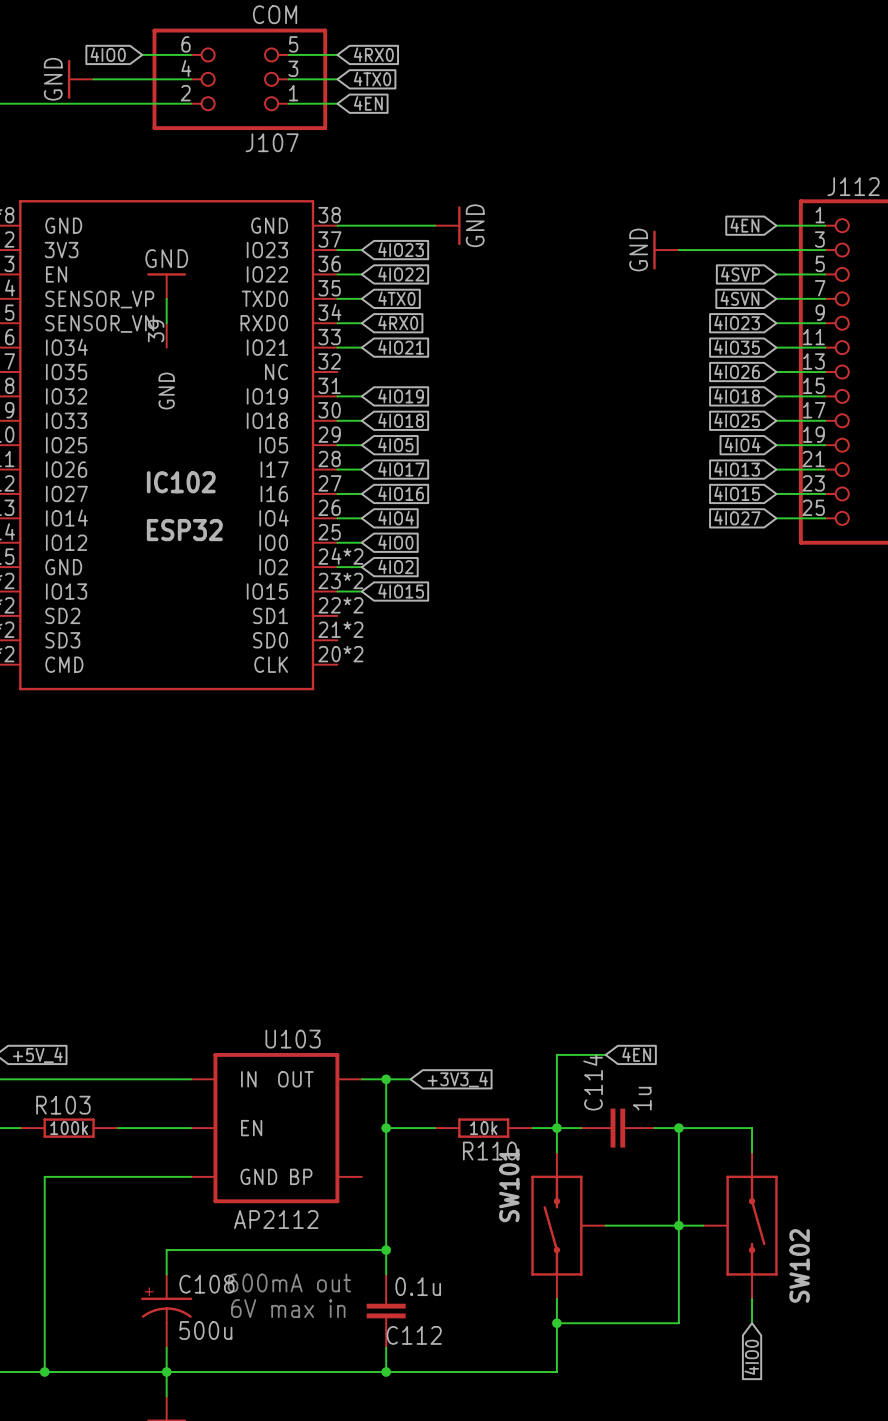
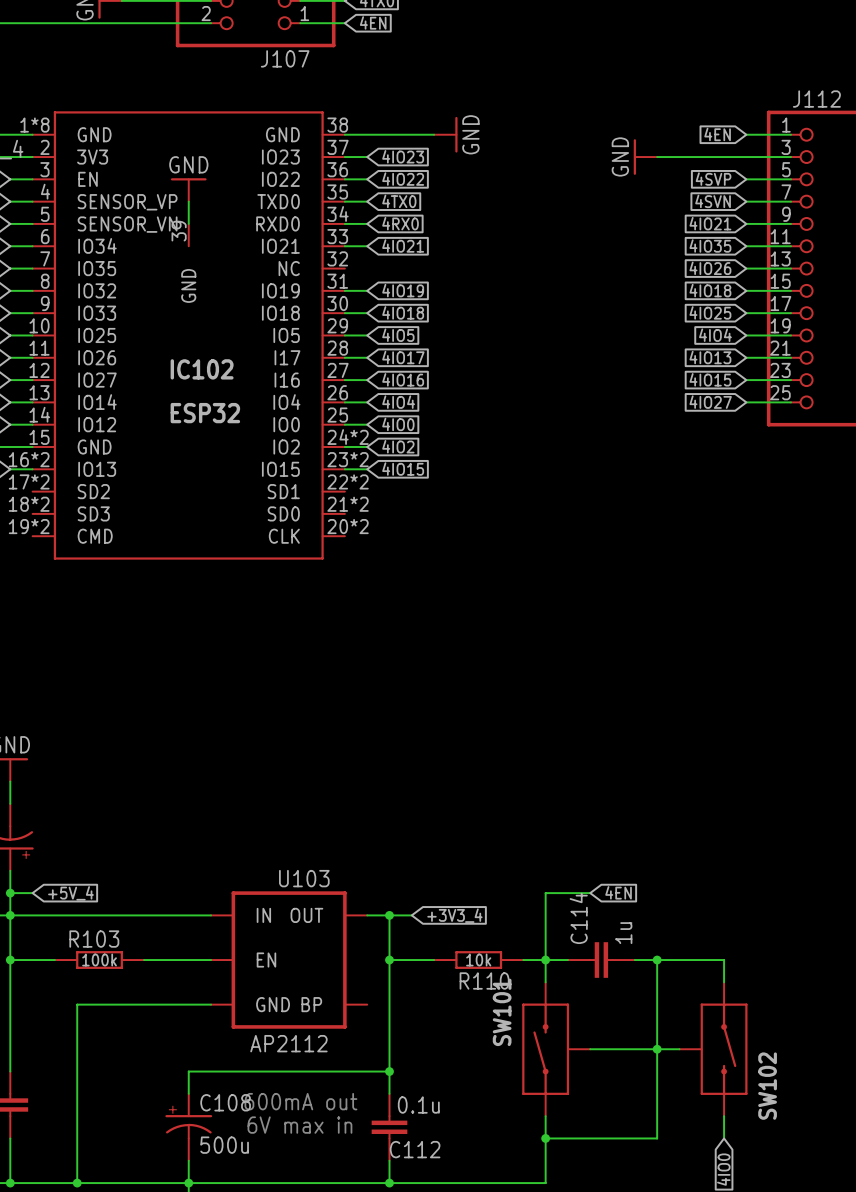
global label: 4IO23 (737, 322) -> 4IO21 (710, 223)

